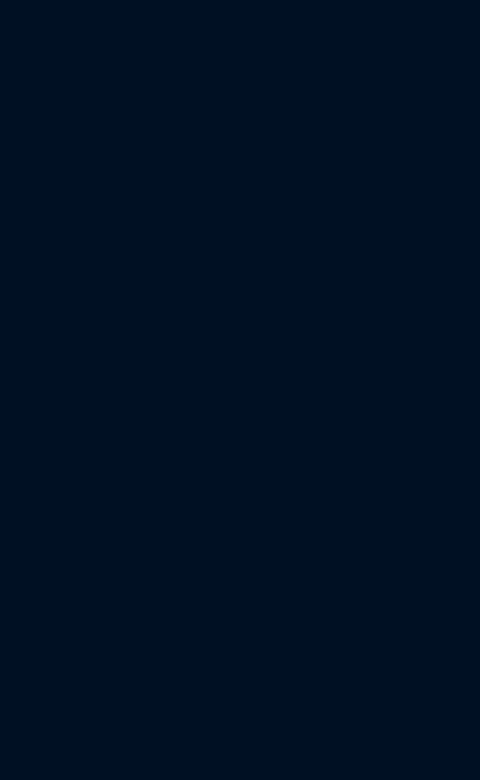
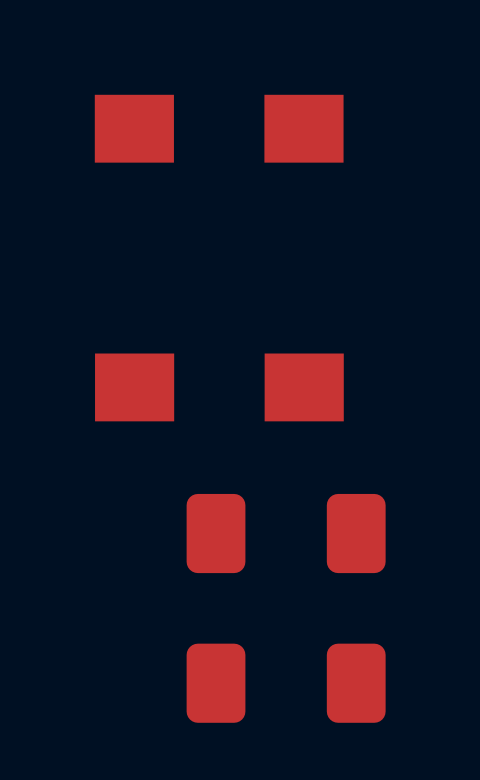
part: none -> (219, 128)
part: none -> (219, 387)
part: none -> (286, 533)
part: none -> (286, 683)

